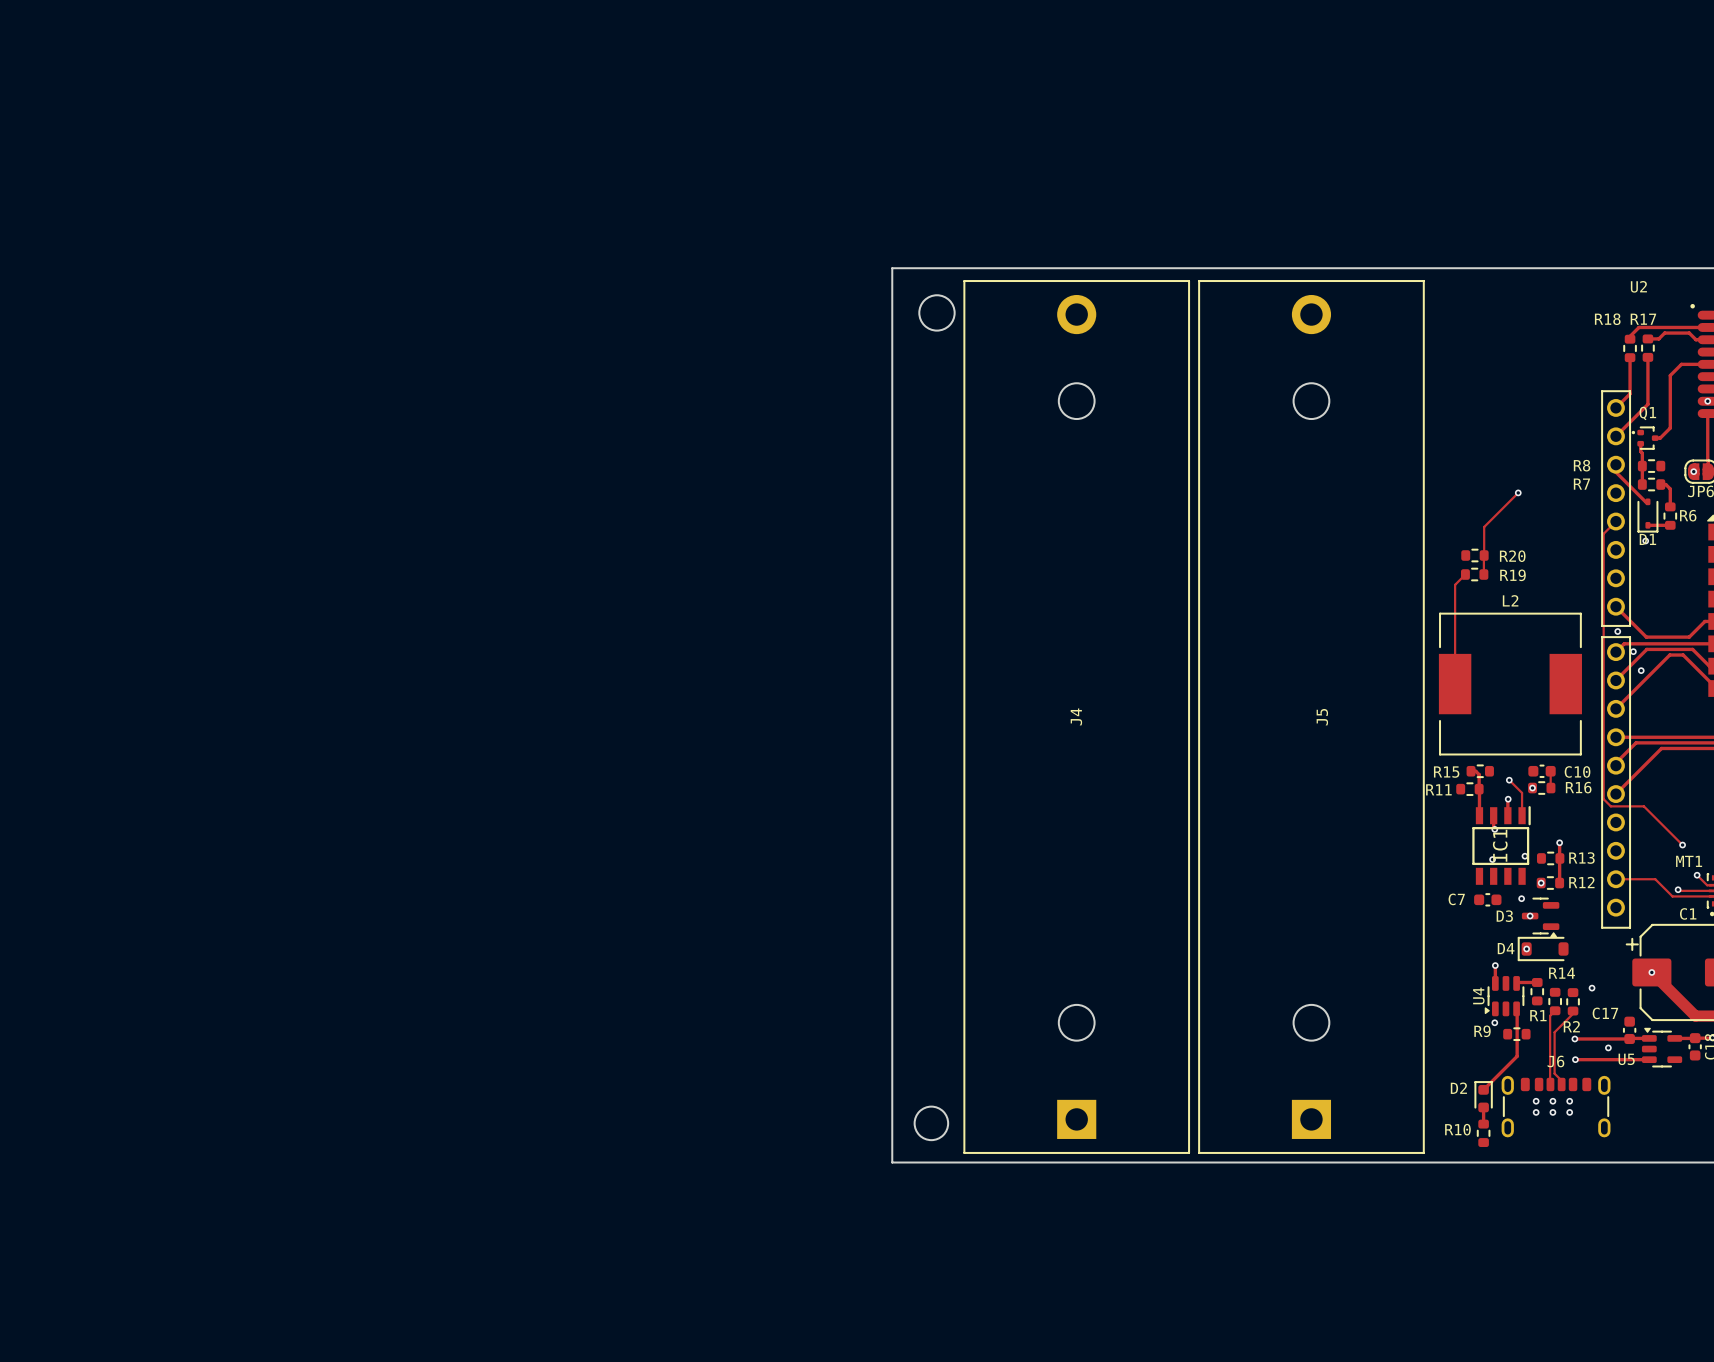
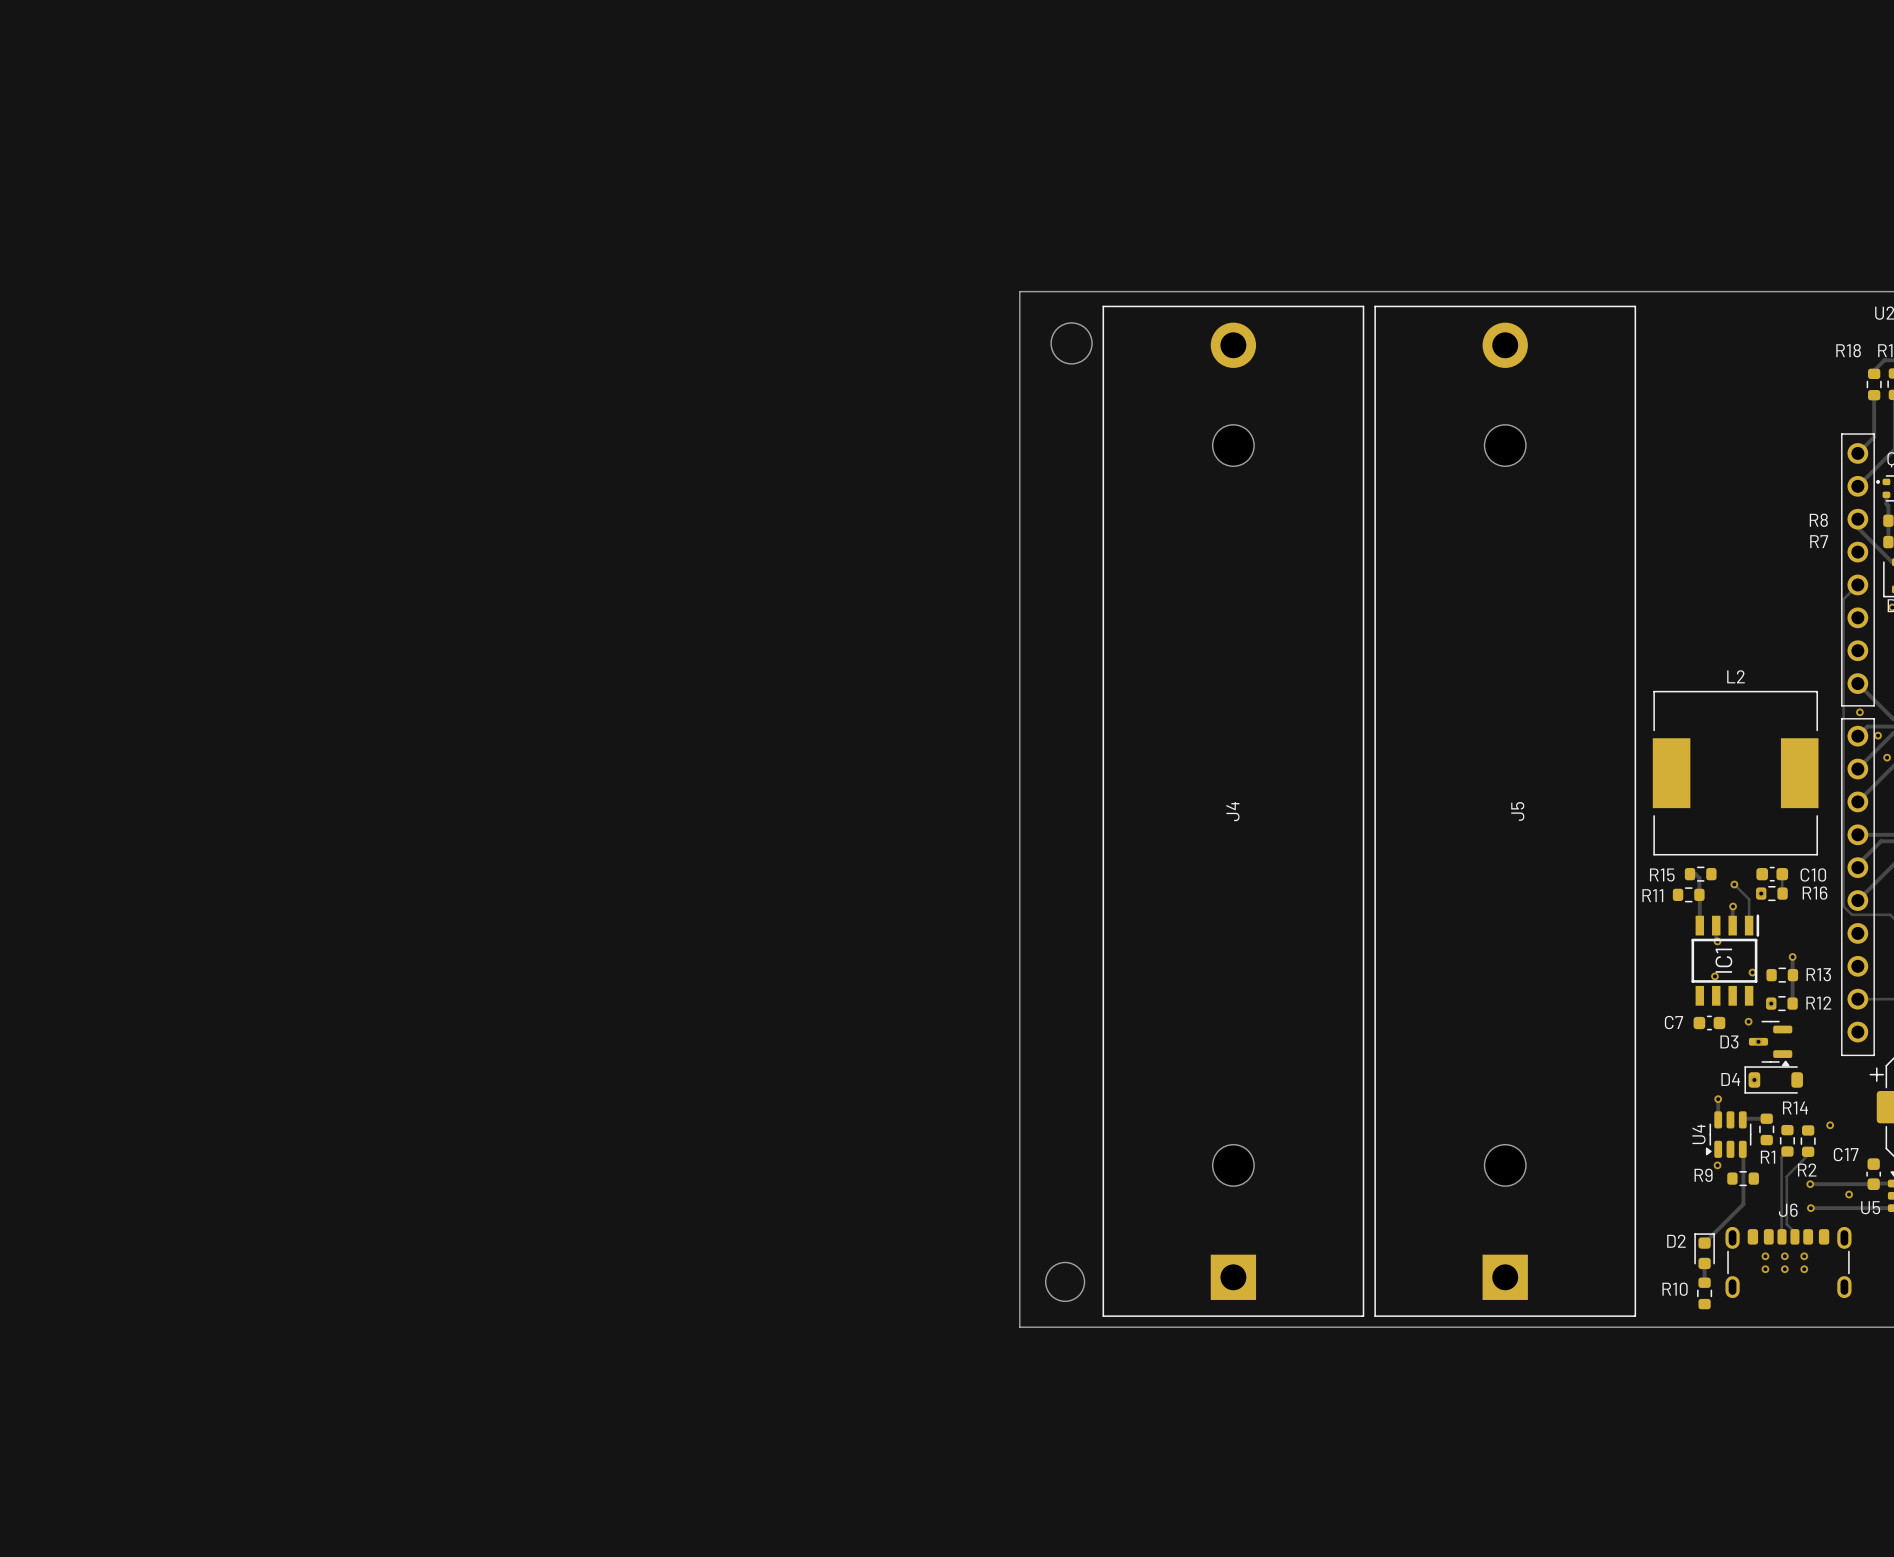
track: (1518, 492) (1484, 527) (1483, 574) -> none
via: (1518, 492) -> none
R20: (1474, 555) -> none
track: (1465, 574) (1455, 584) (1455, 684) -> none
R19: (1474, 574) -> none

